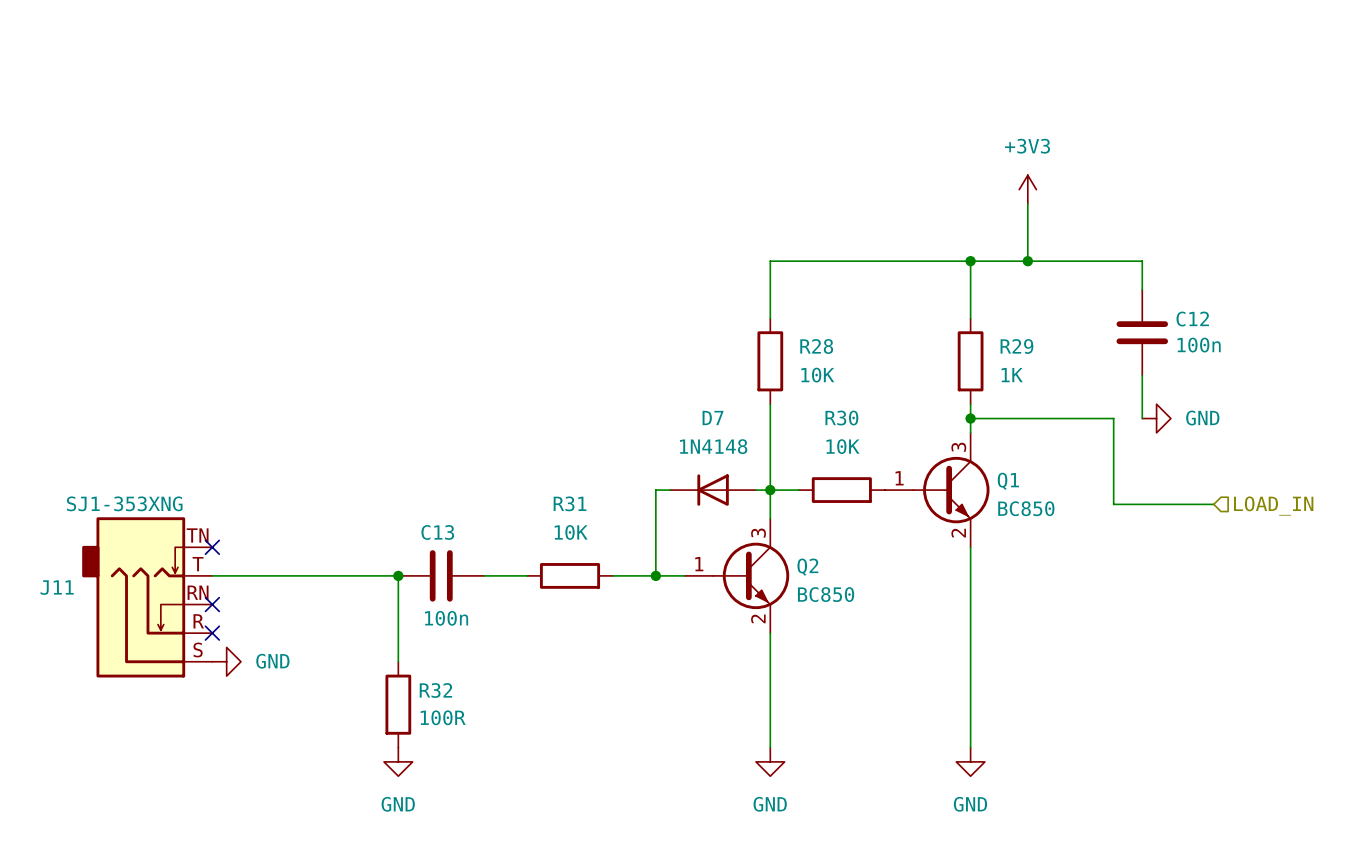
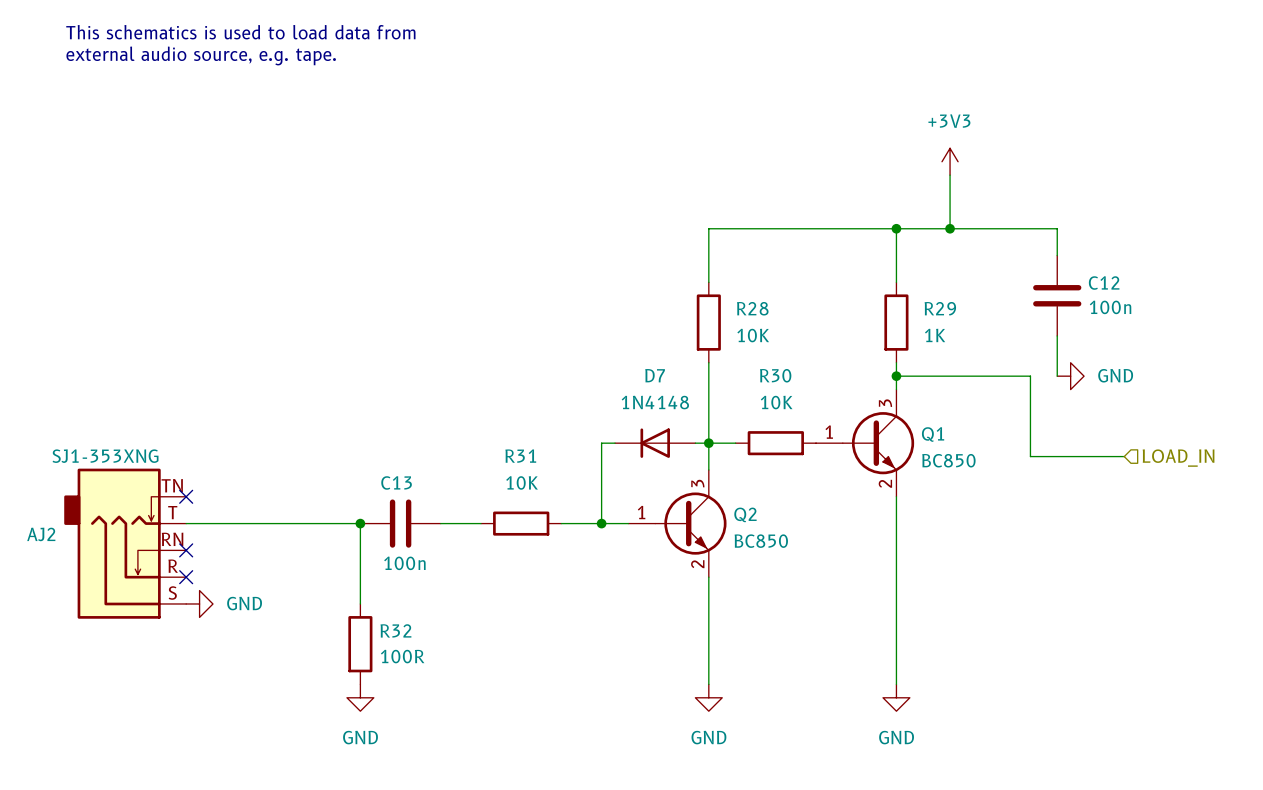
text: none -> This schematics is used to load data from (240, 32)
text: none -> external audio source, e.g. tape. (201, 55)
J11 name: J11 (57, 587) -> AJ2 (41, 534)

